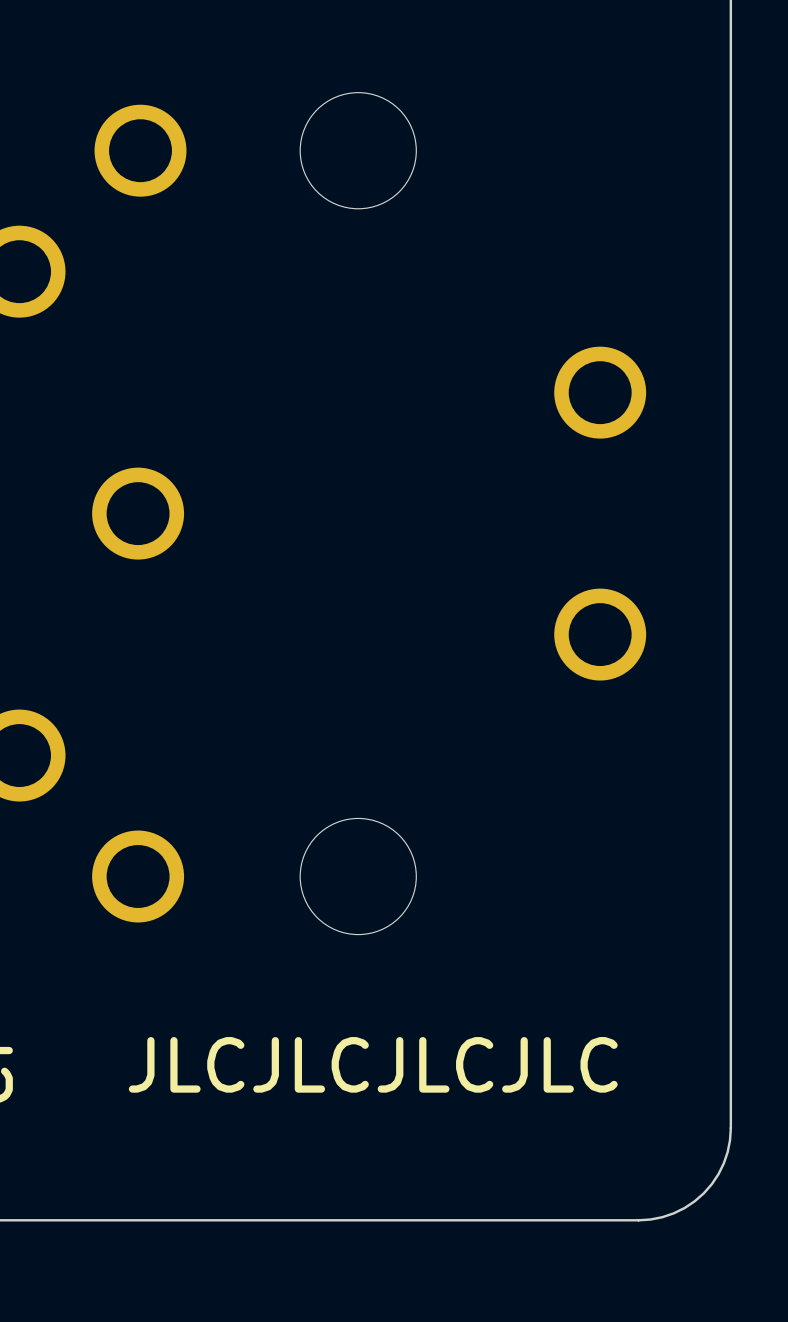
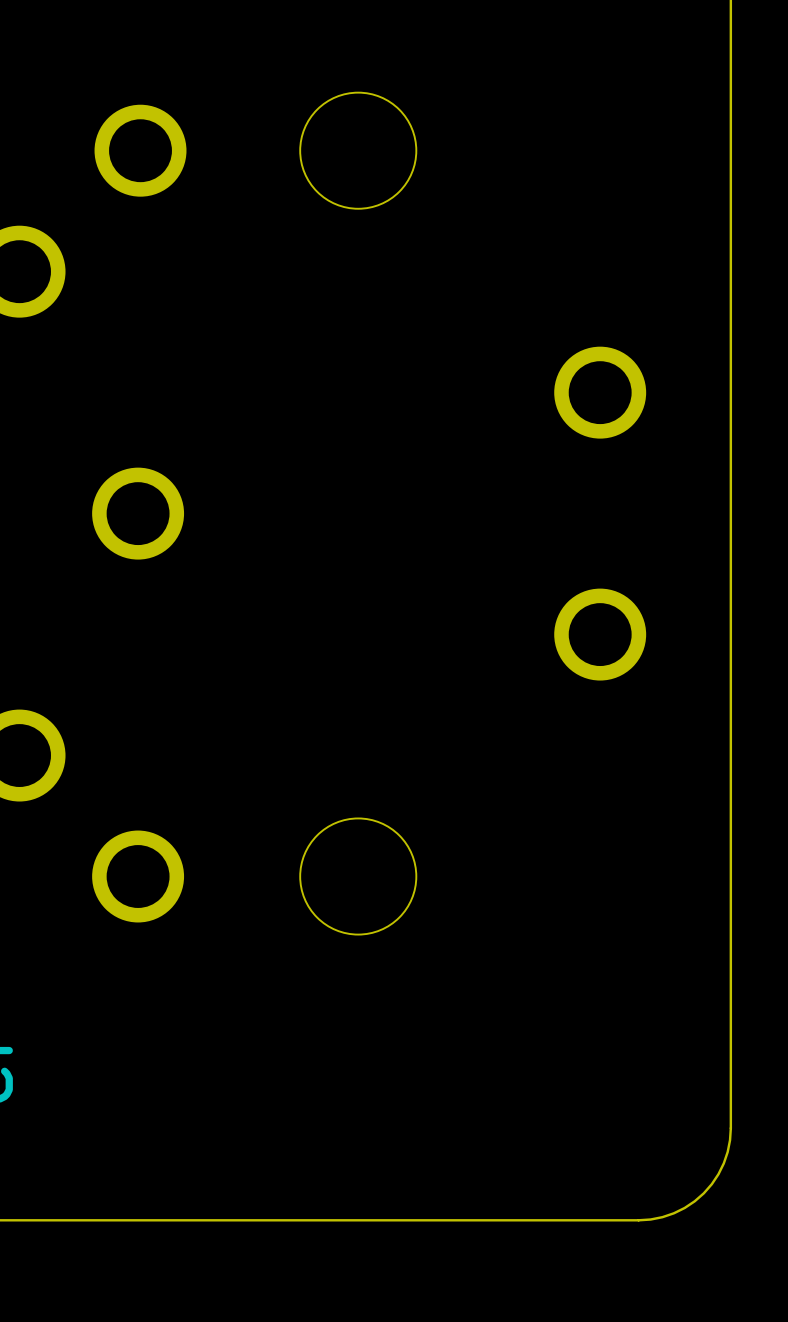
text: JLCJLCJLCJLC (373, 1064) -> none

